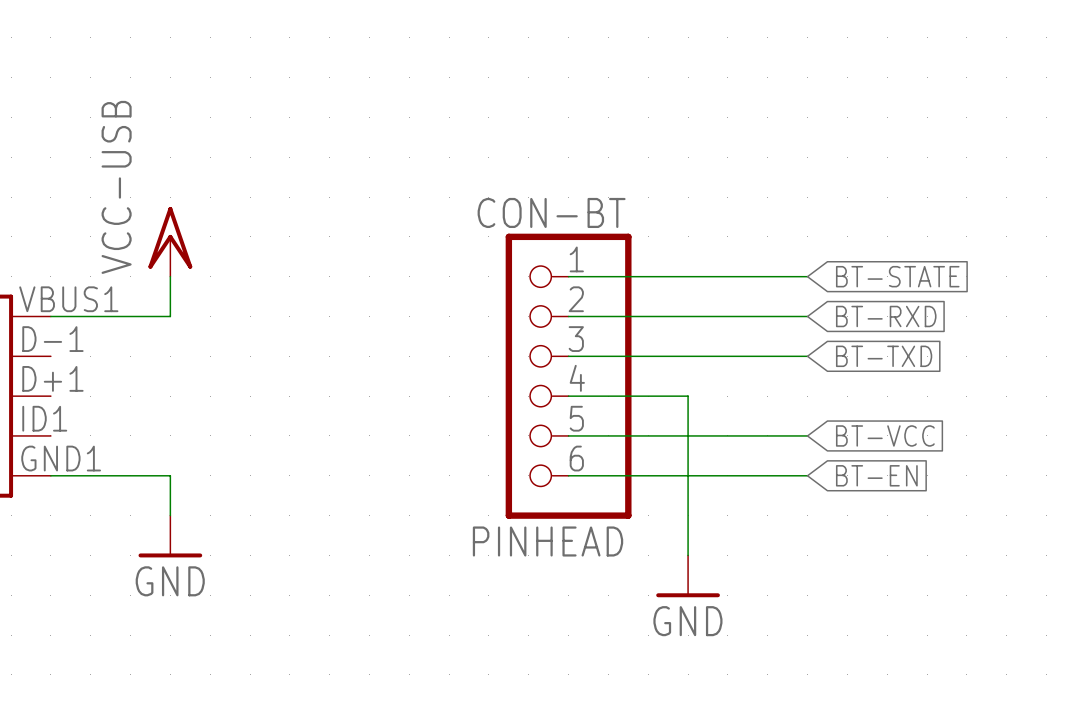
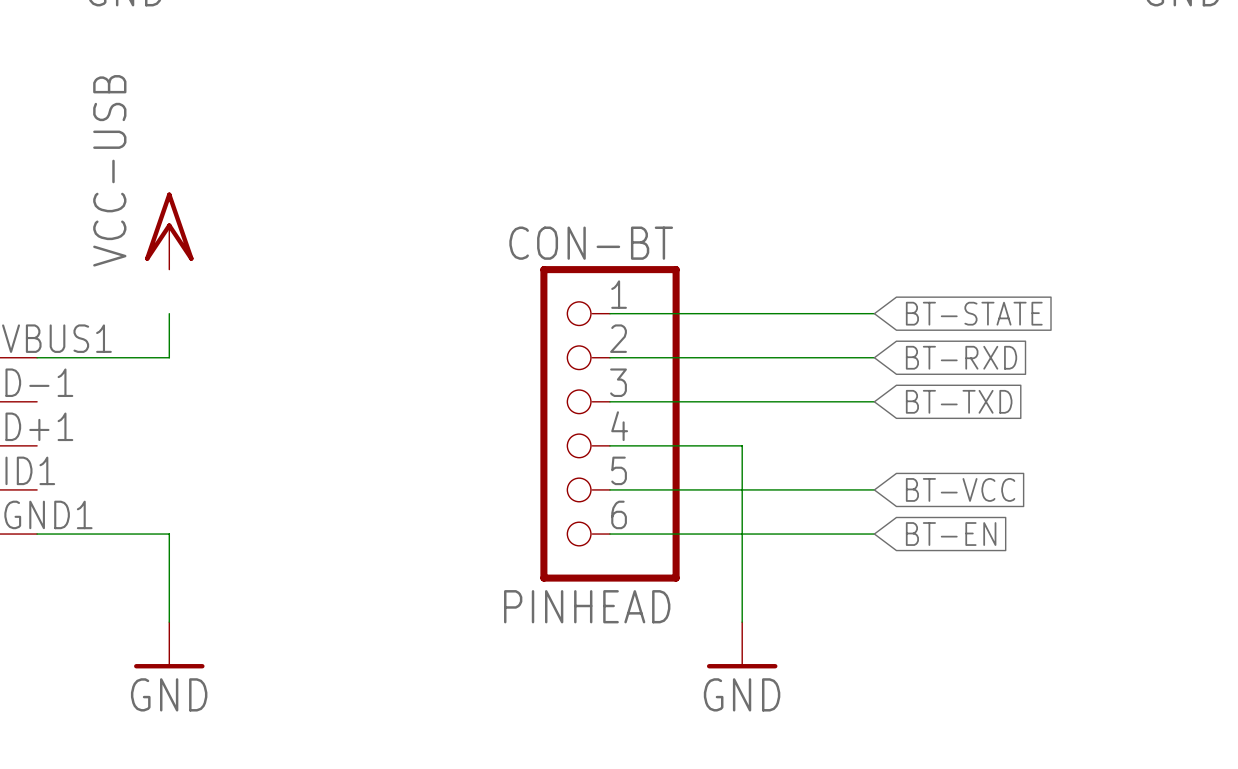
power symbol position: VCC-USB (170, 241) -> VCC-USB (169, 231)
power symbol position: GND (170, 536) -> GND (169, 645)

